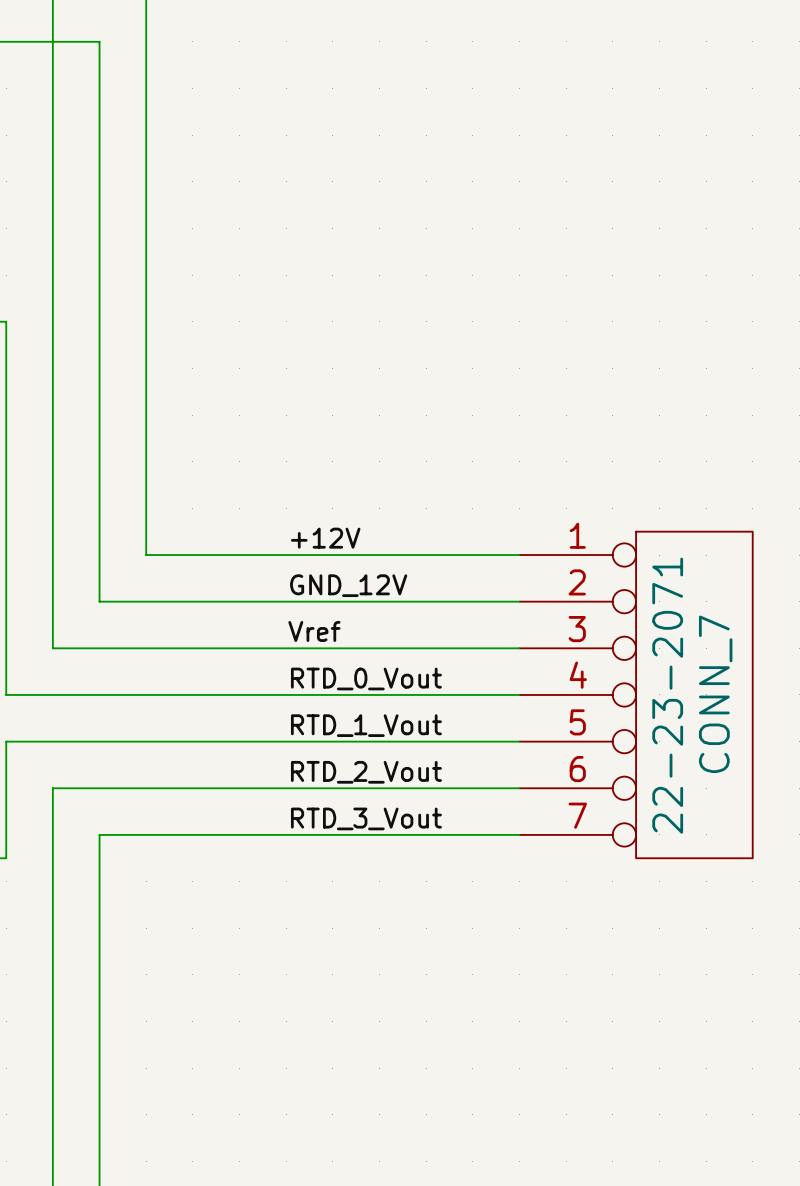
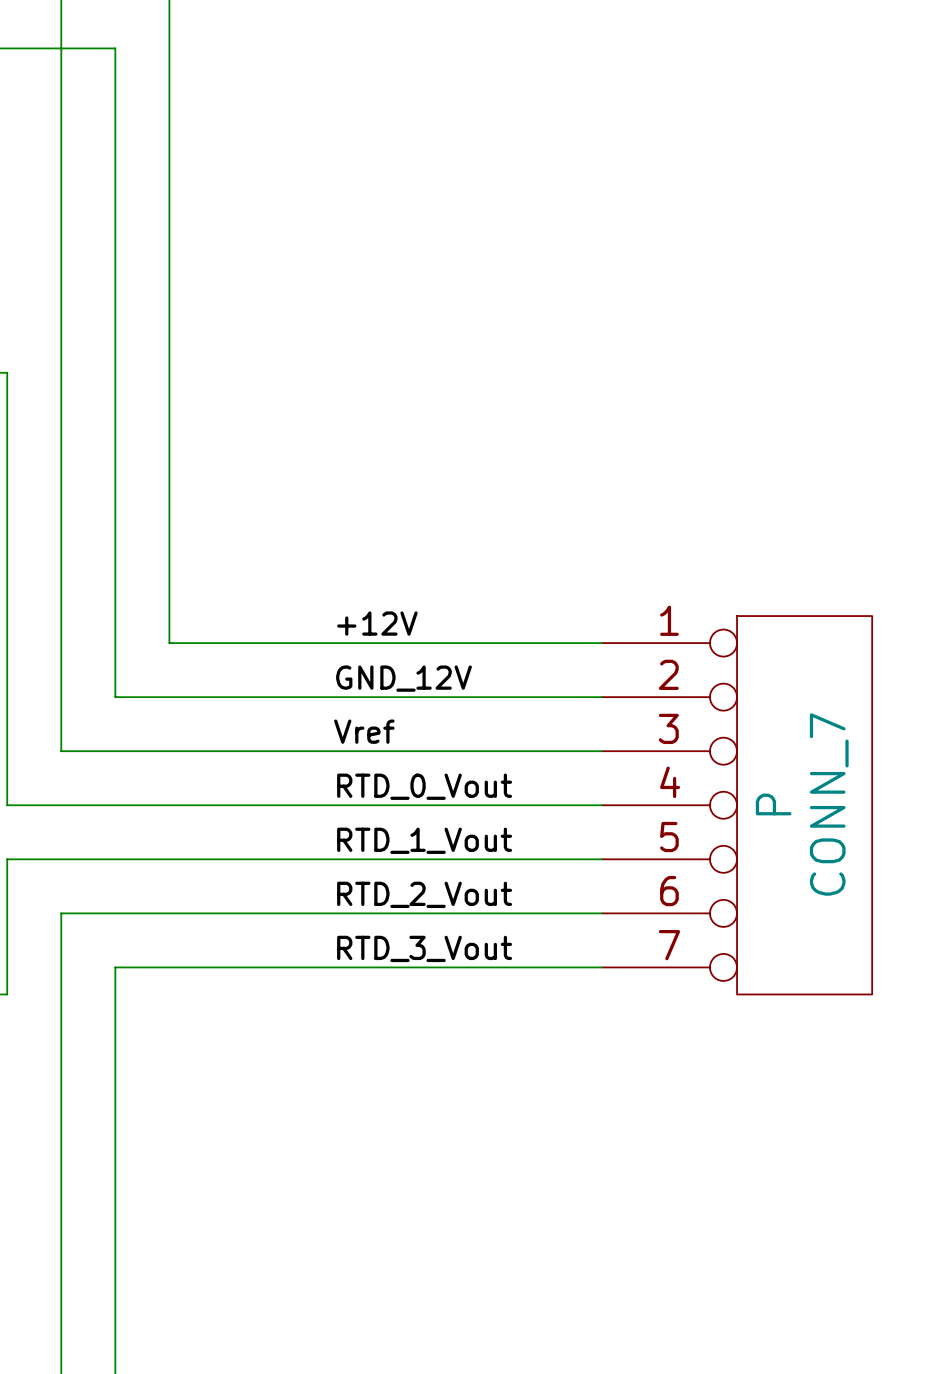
22-23-2071 name: 22-23-2071 (667, 695) -> P (773, 804)

